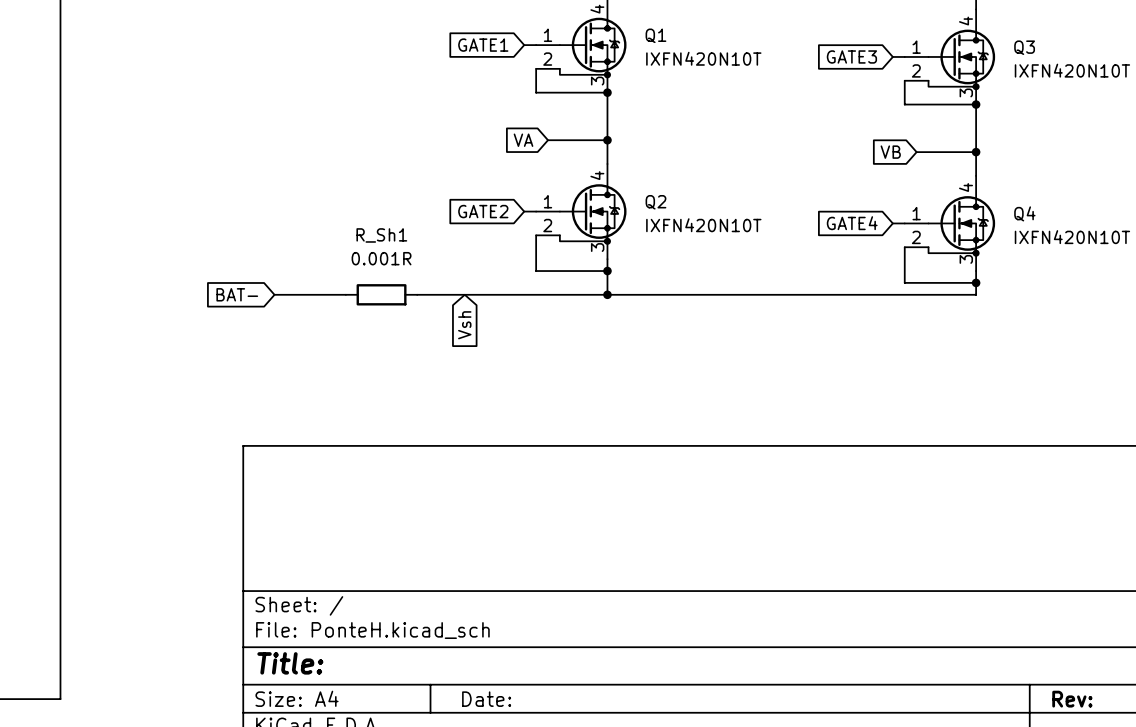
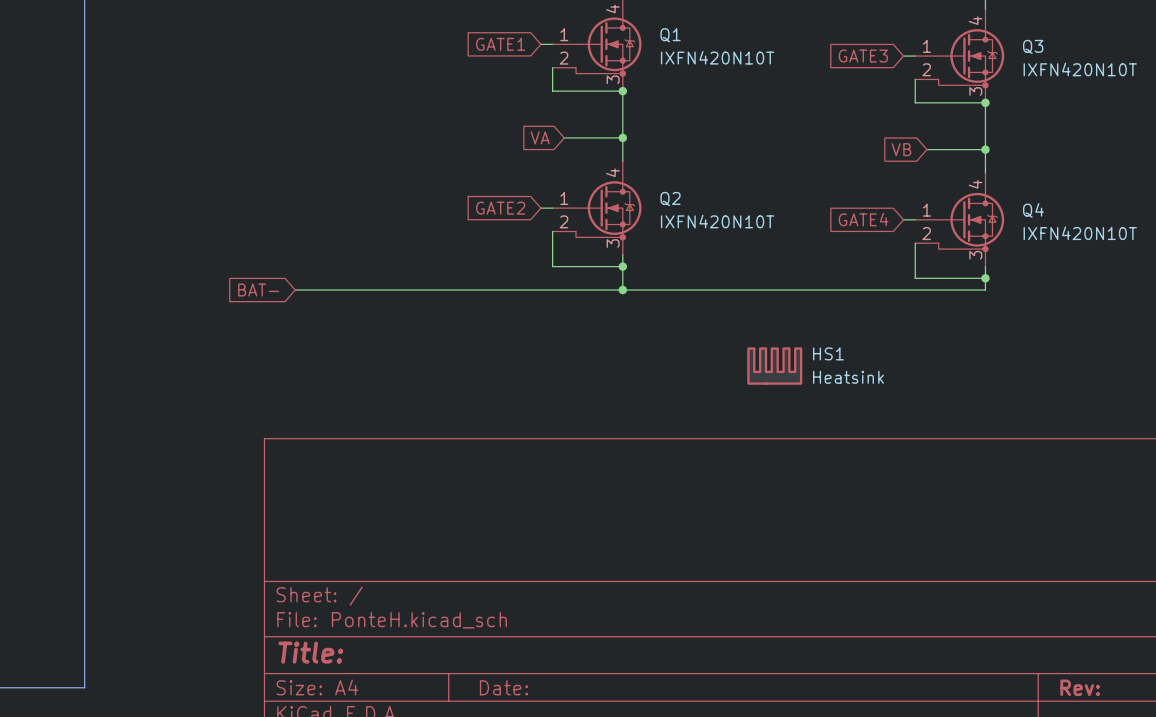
wire: none -> (365, 290) (435, 290)
R_Sh1: 0.001R (381, 294) -> none
global label: Vsh (464, 325) -> none
HS1: none -> Heatsink (774, 366)

